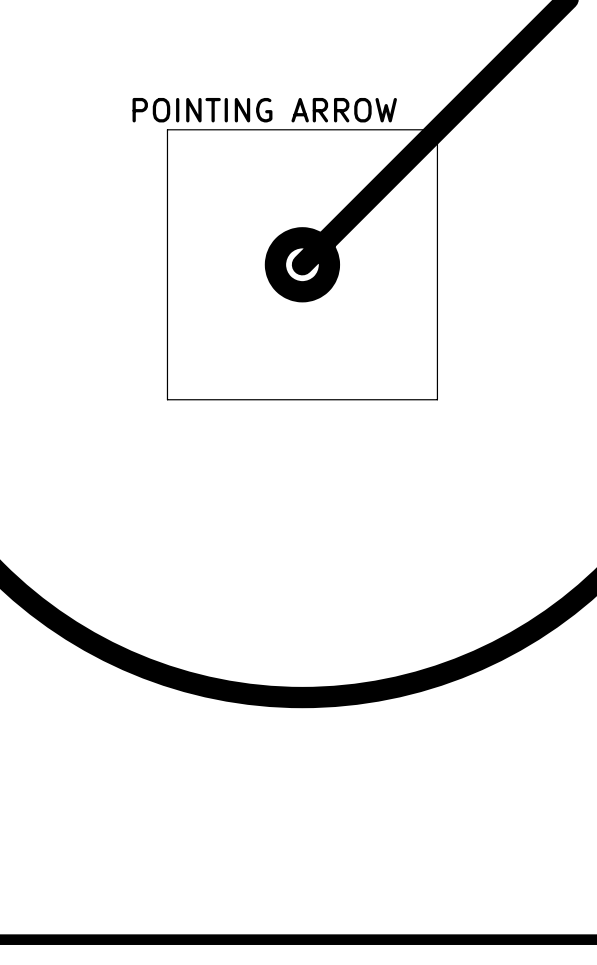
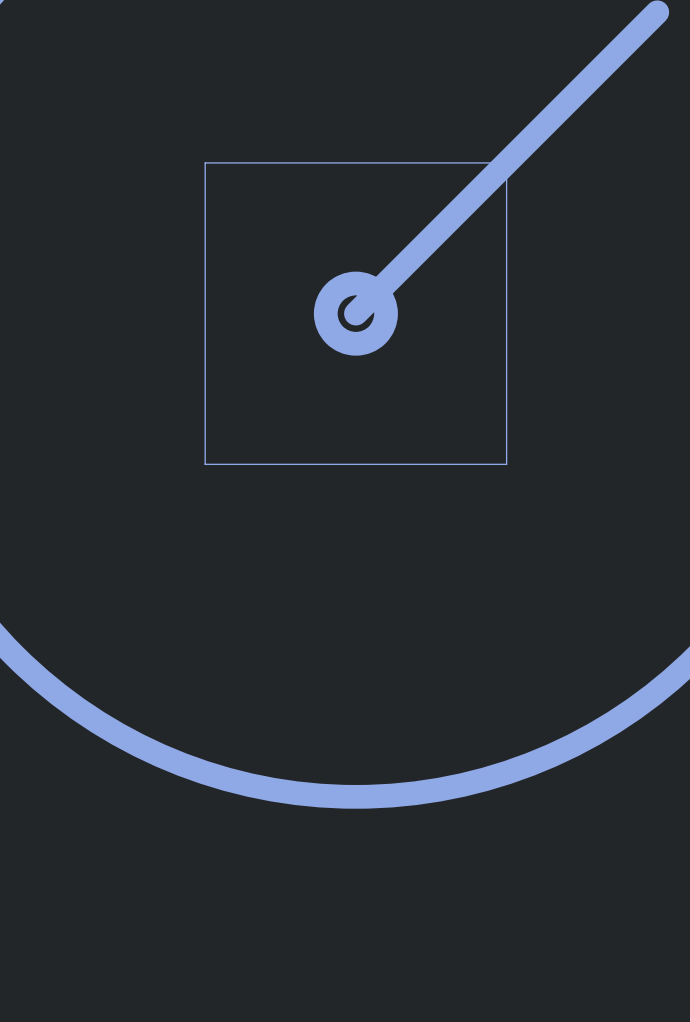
text: POINTING ARROW (264, 110) -> none

